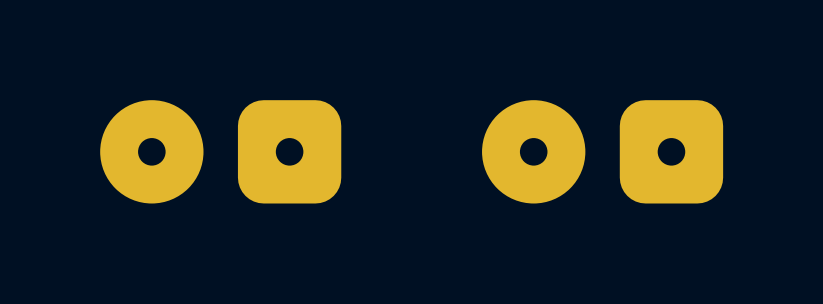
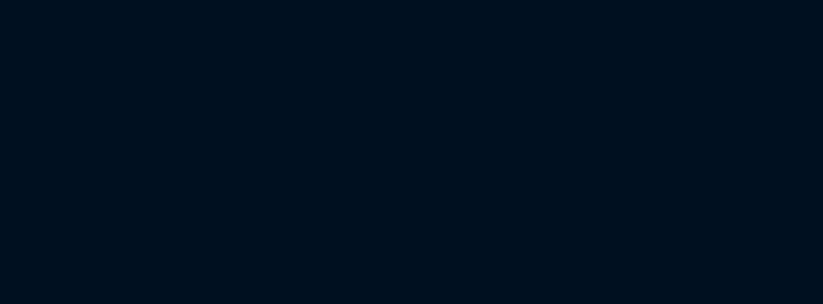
part: (220, 151) -> none
part: (602, 151) -> none

